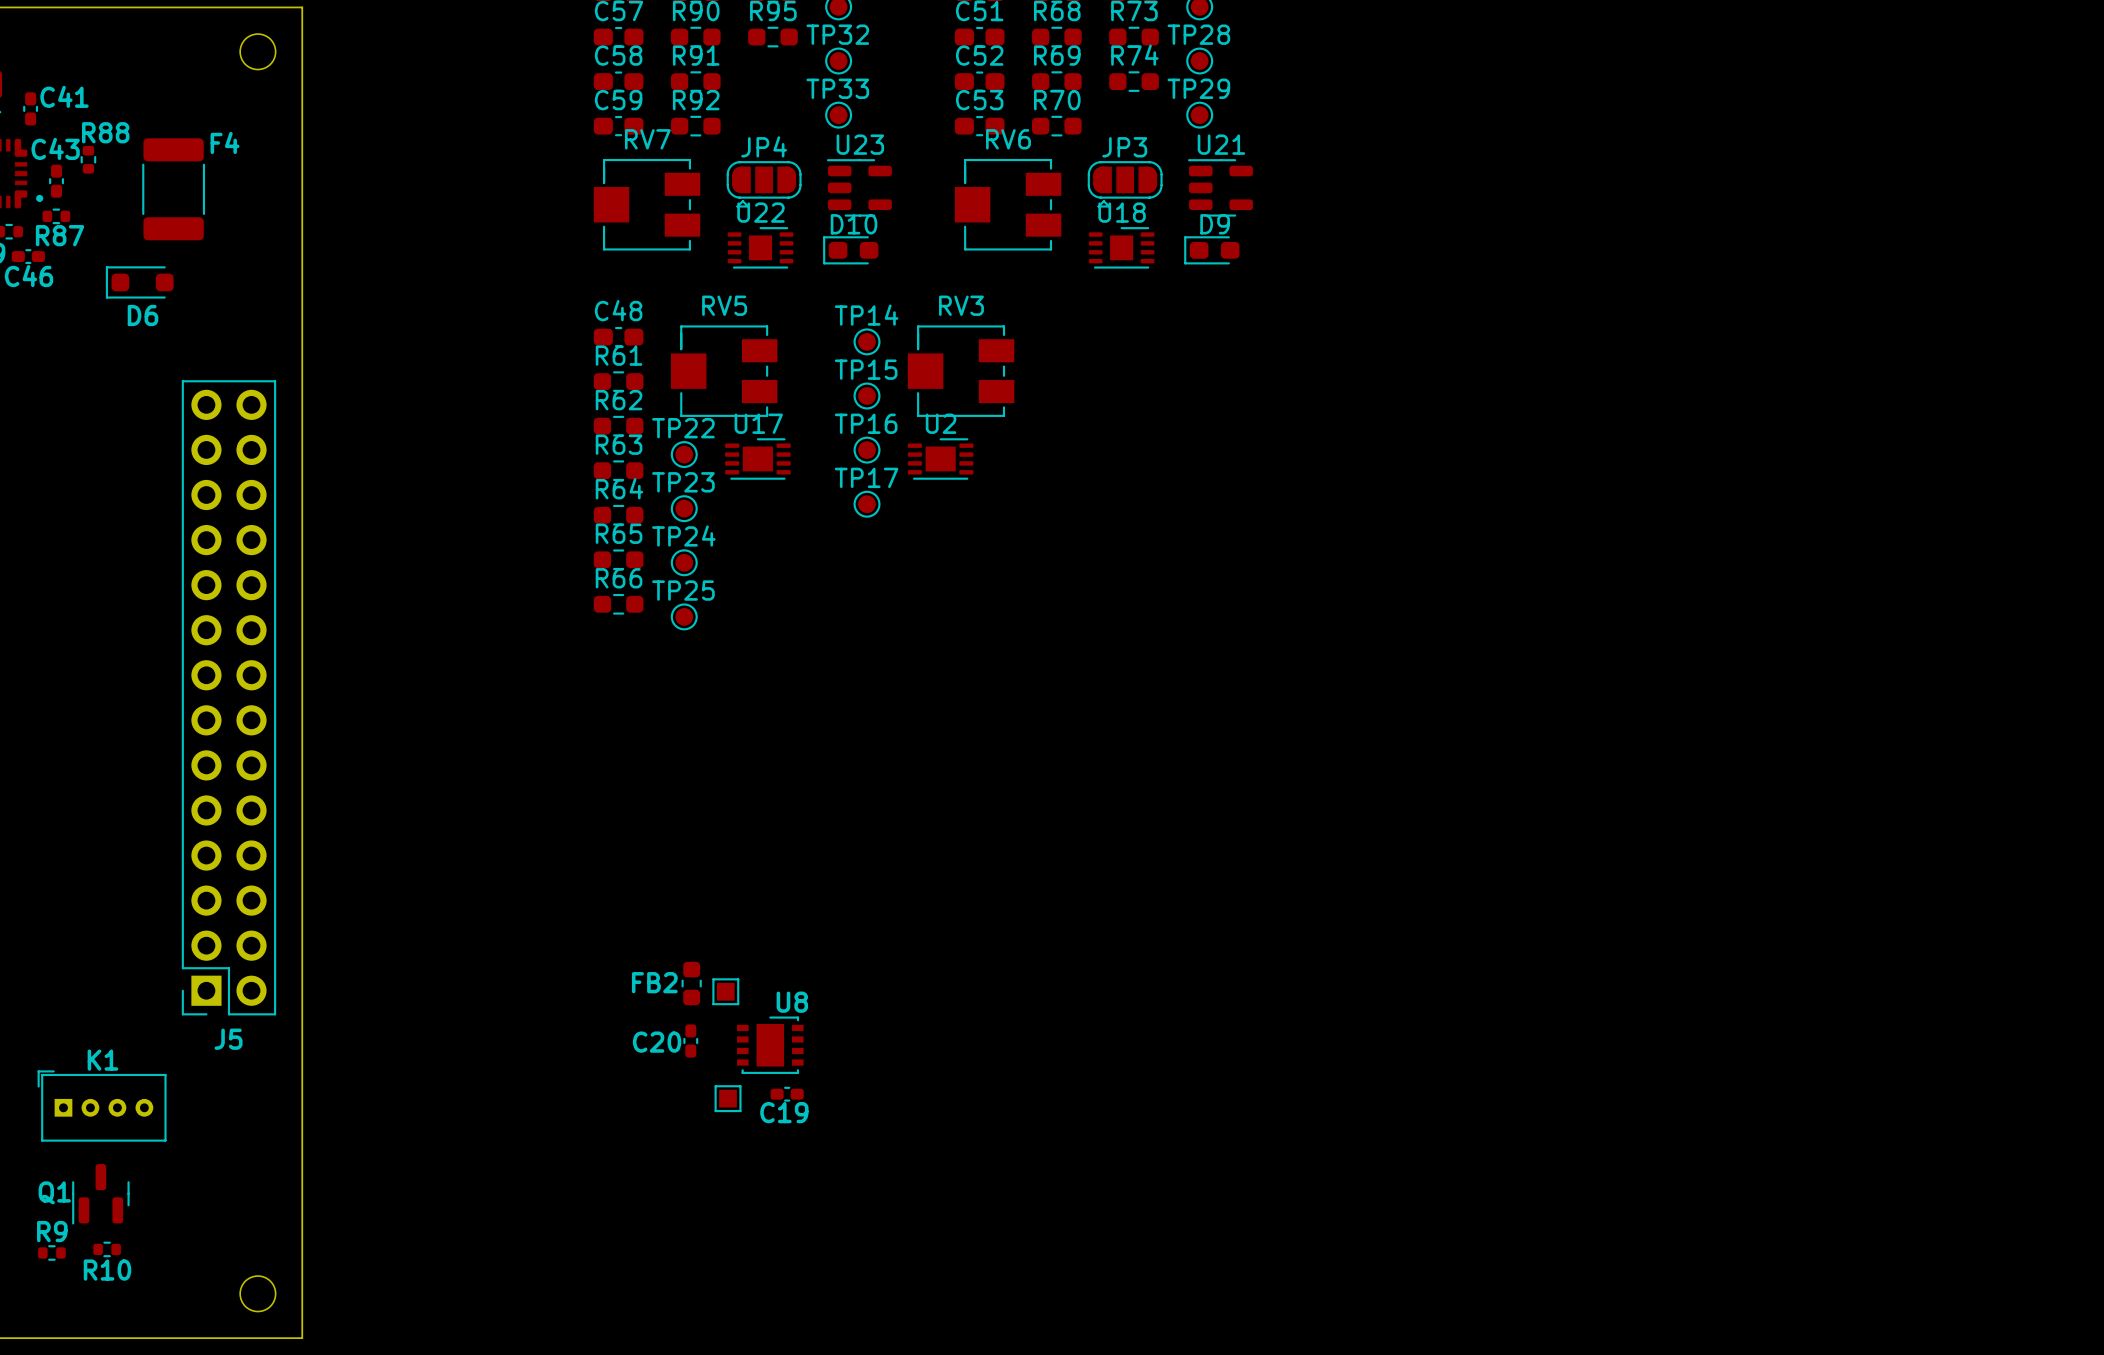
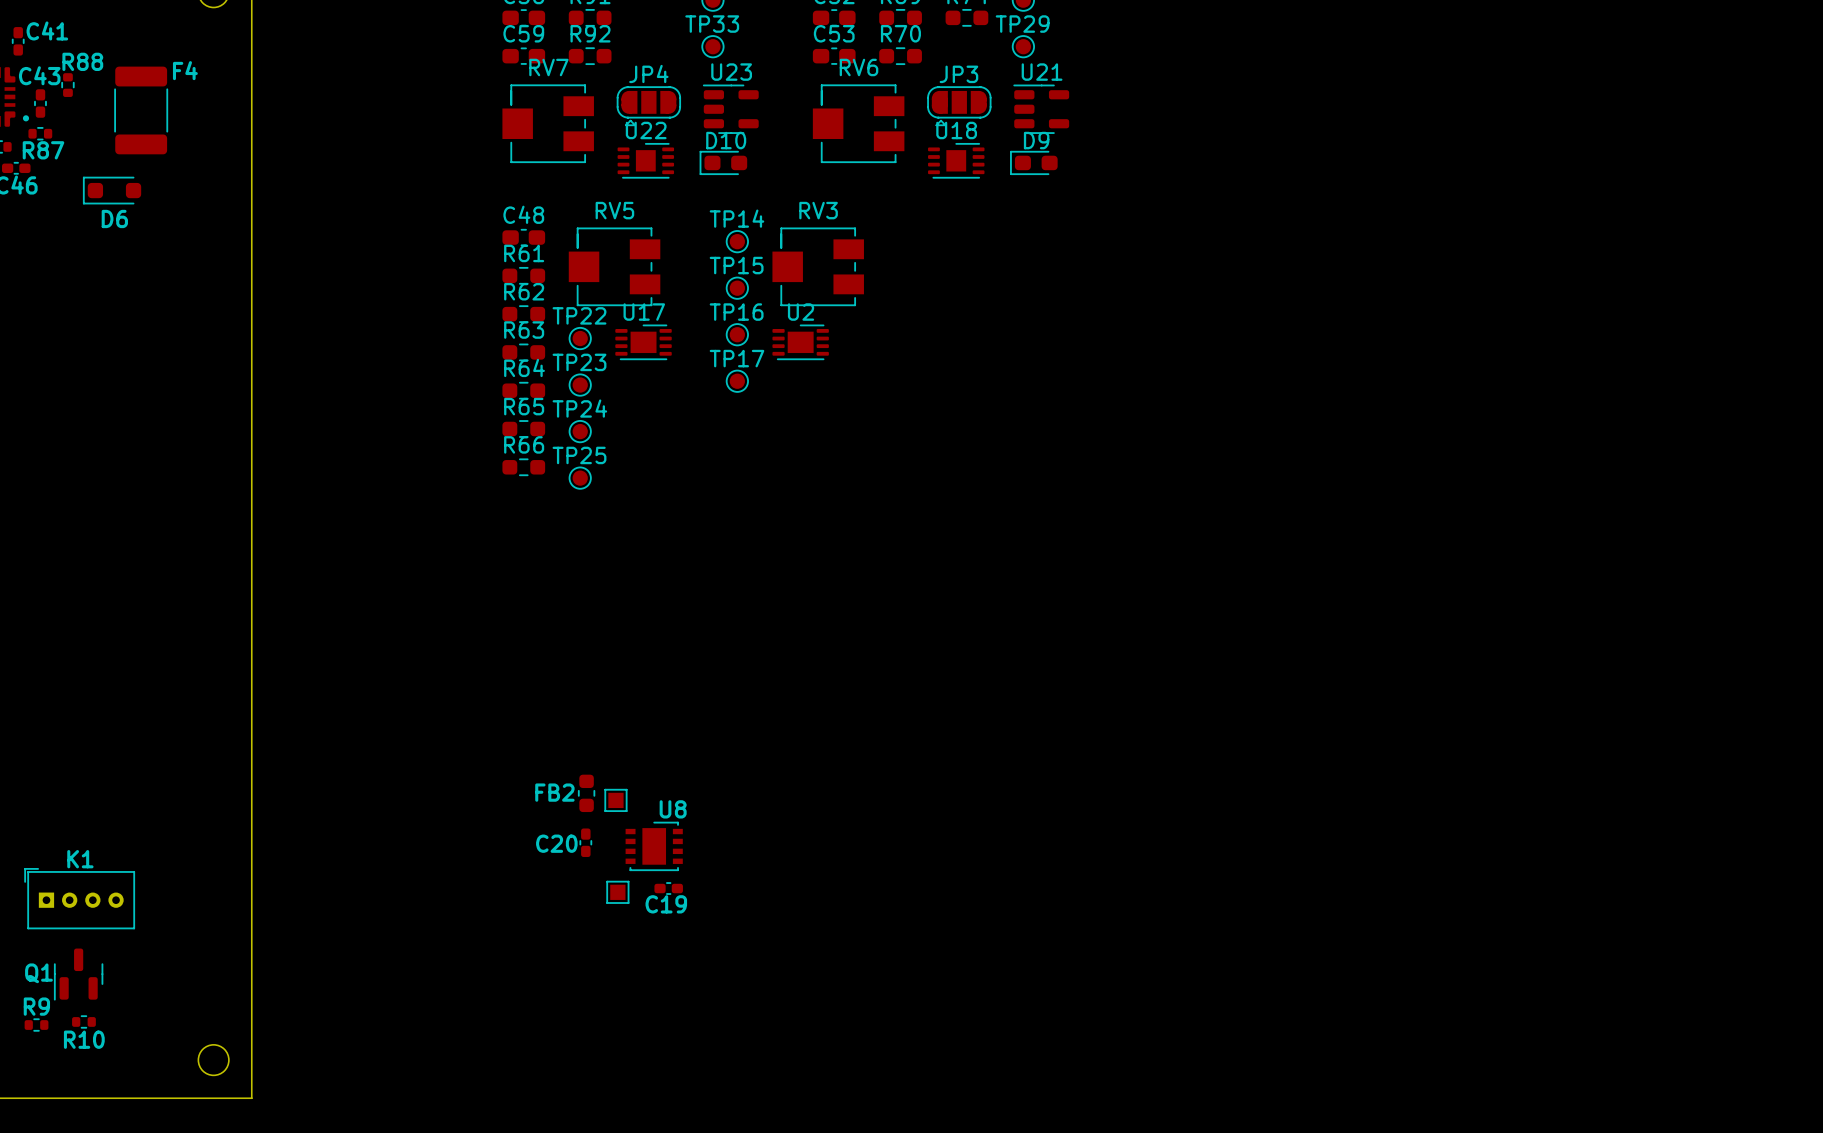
J5: (228, 697) -> none

